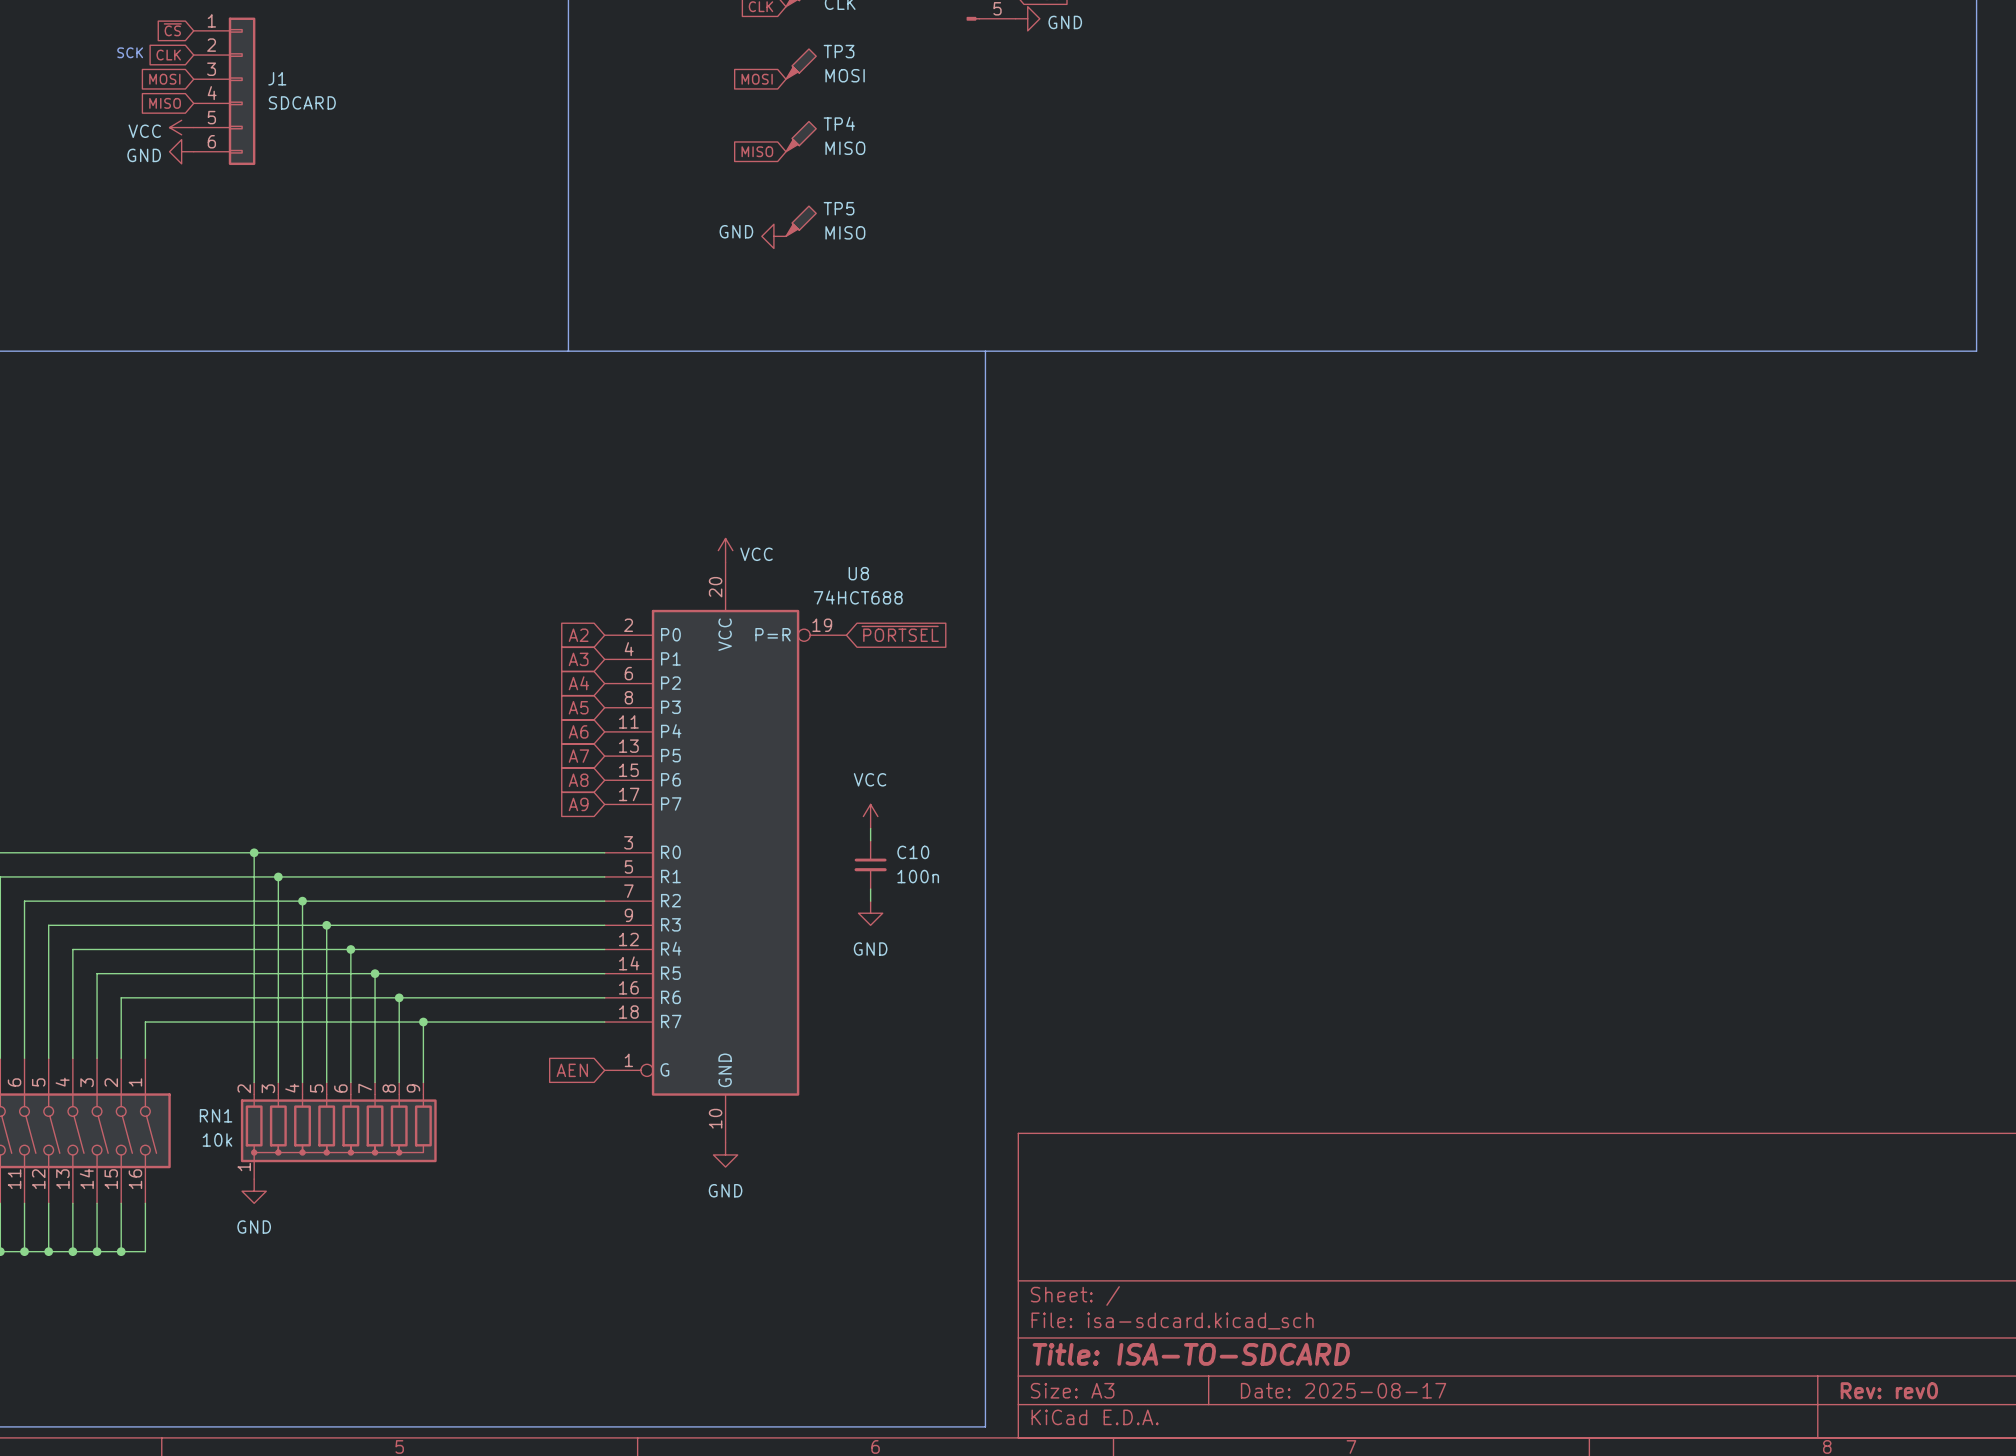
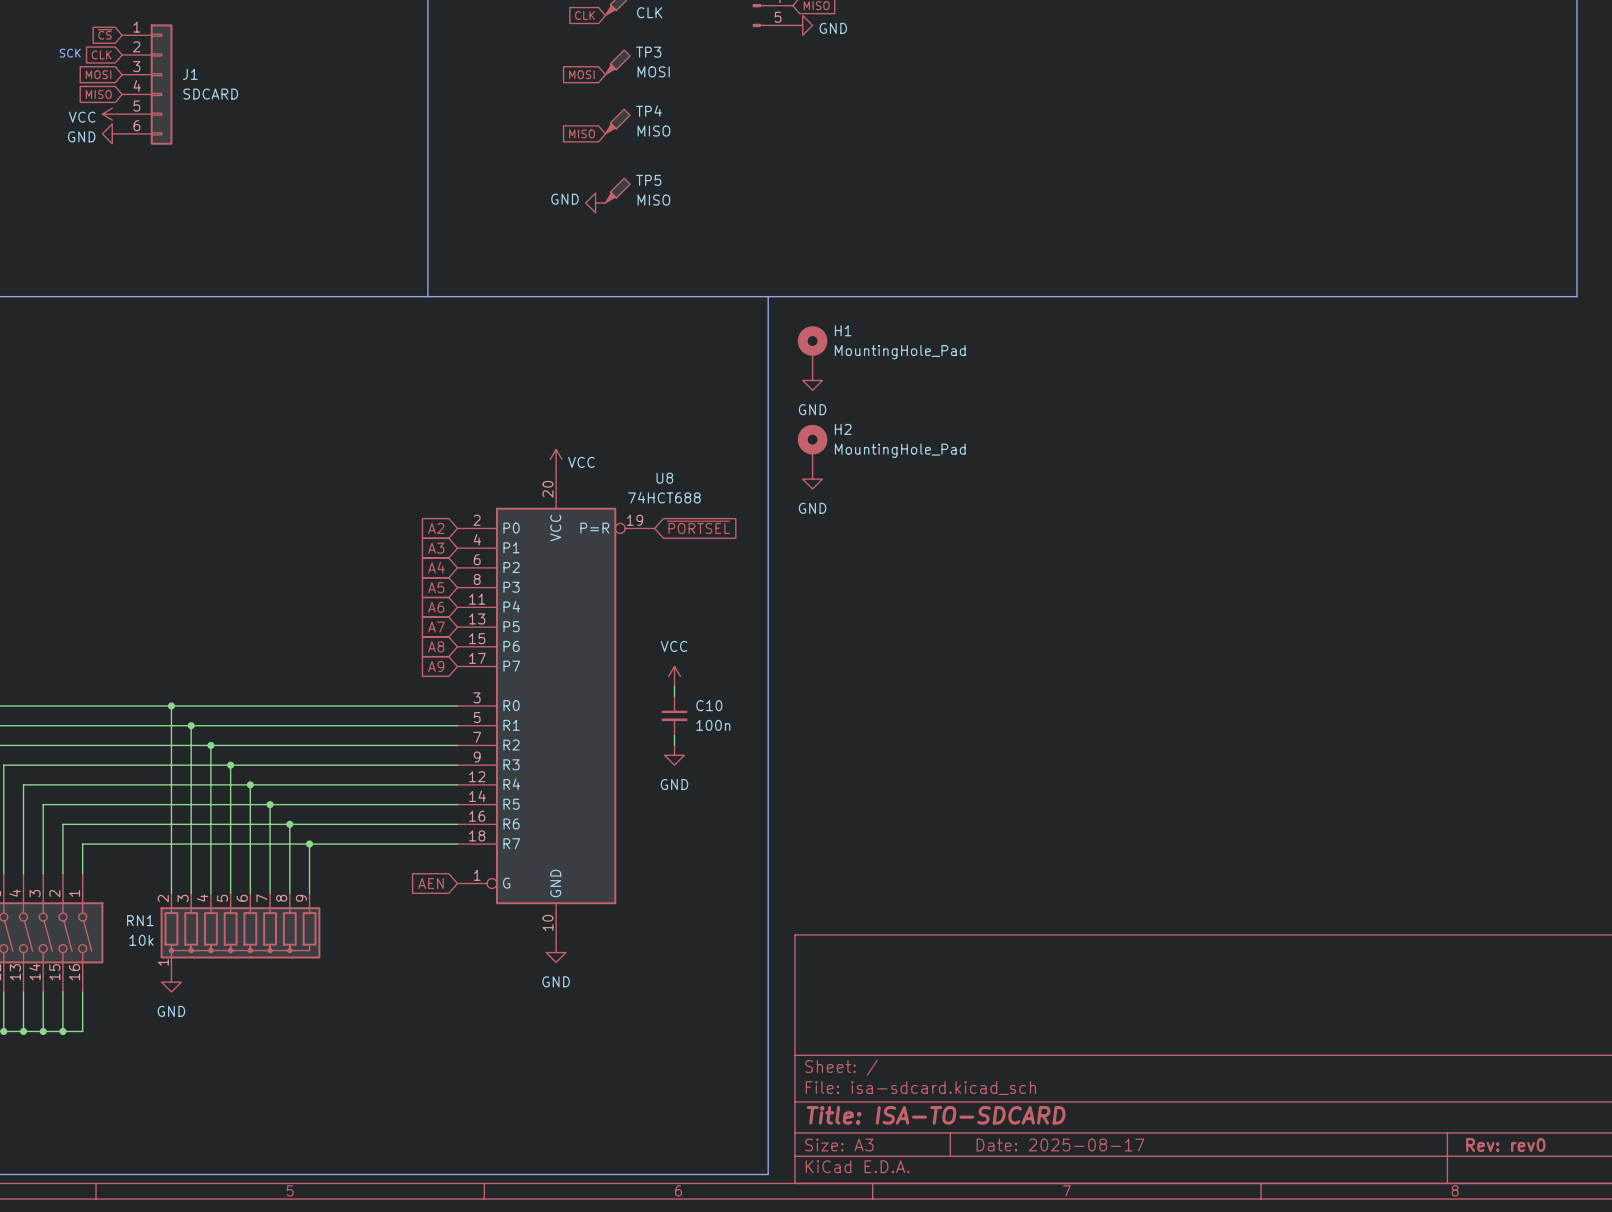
H1: none -> MountingHole_Pad (812, 348)
power symbol: none -> GND (812, 380)
H2: none -> MountingHole_Pad (812, 447)
power symbol: none -> GND (812, 479)

